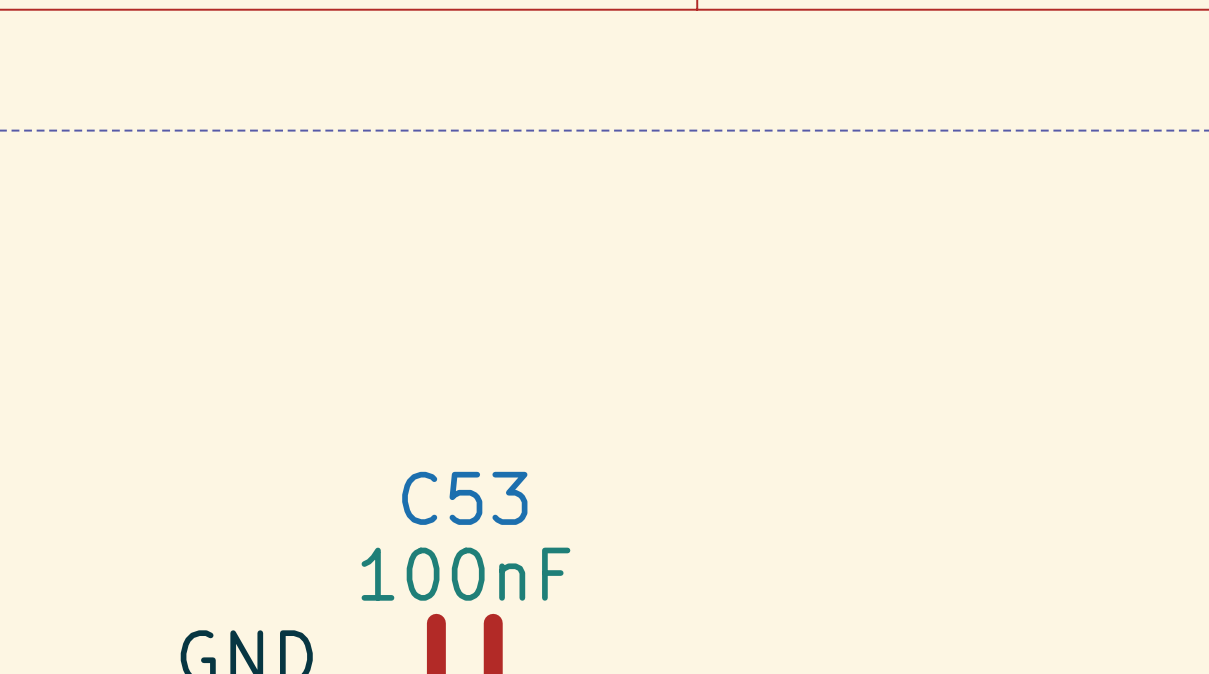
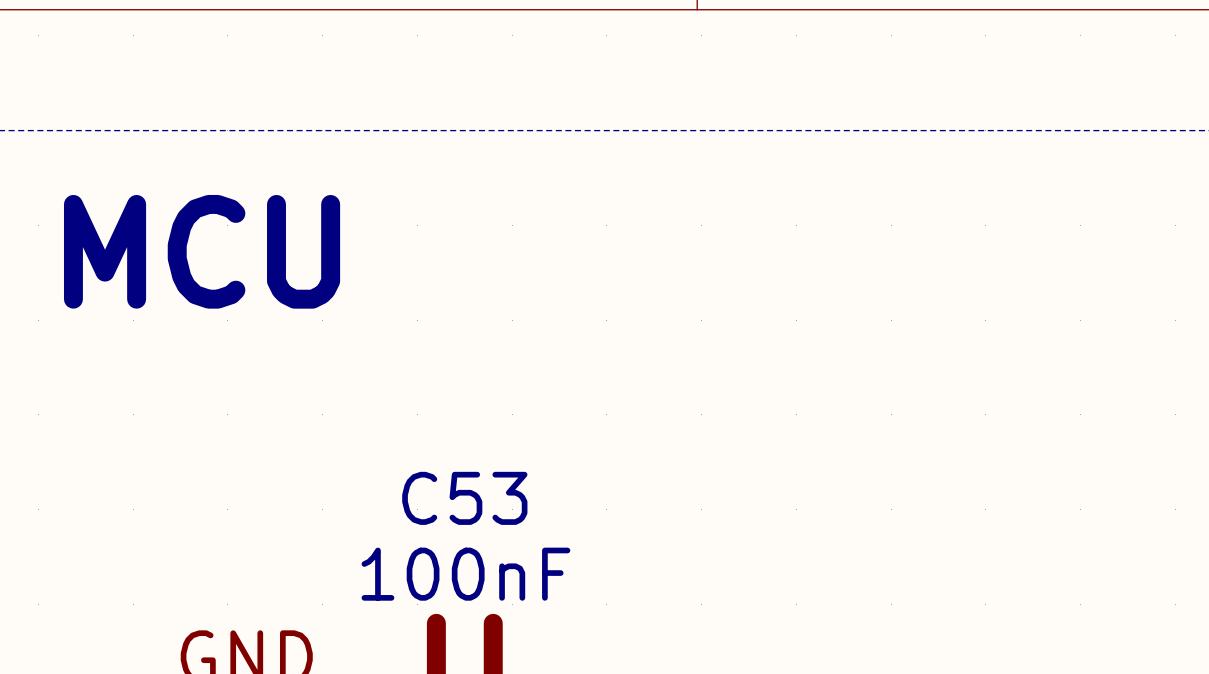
text: none -> MCU (202, 251)

